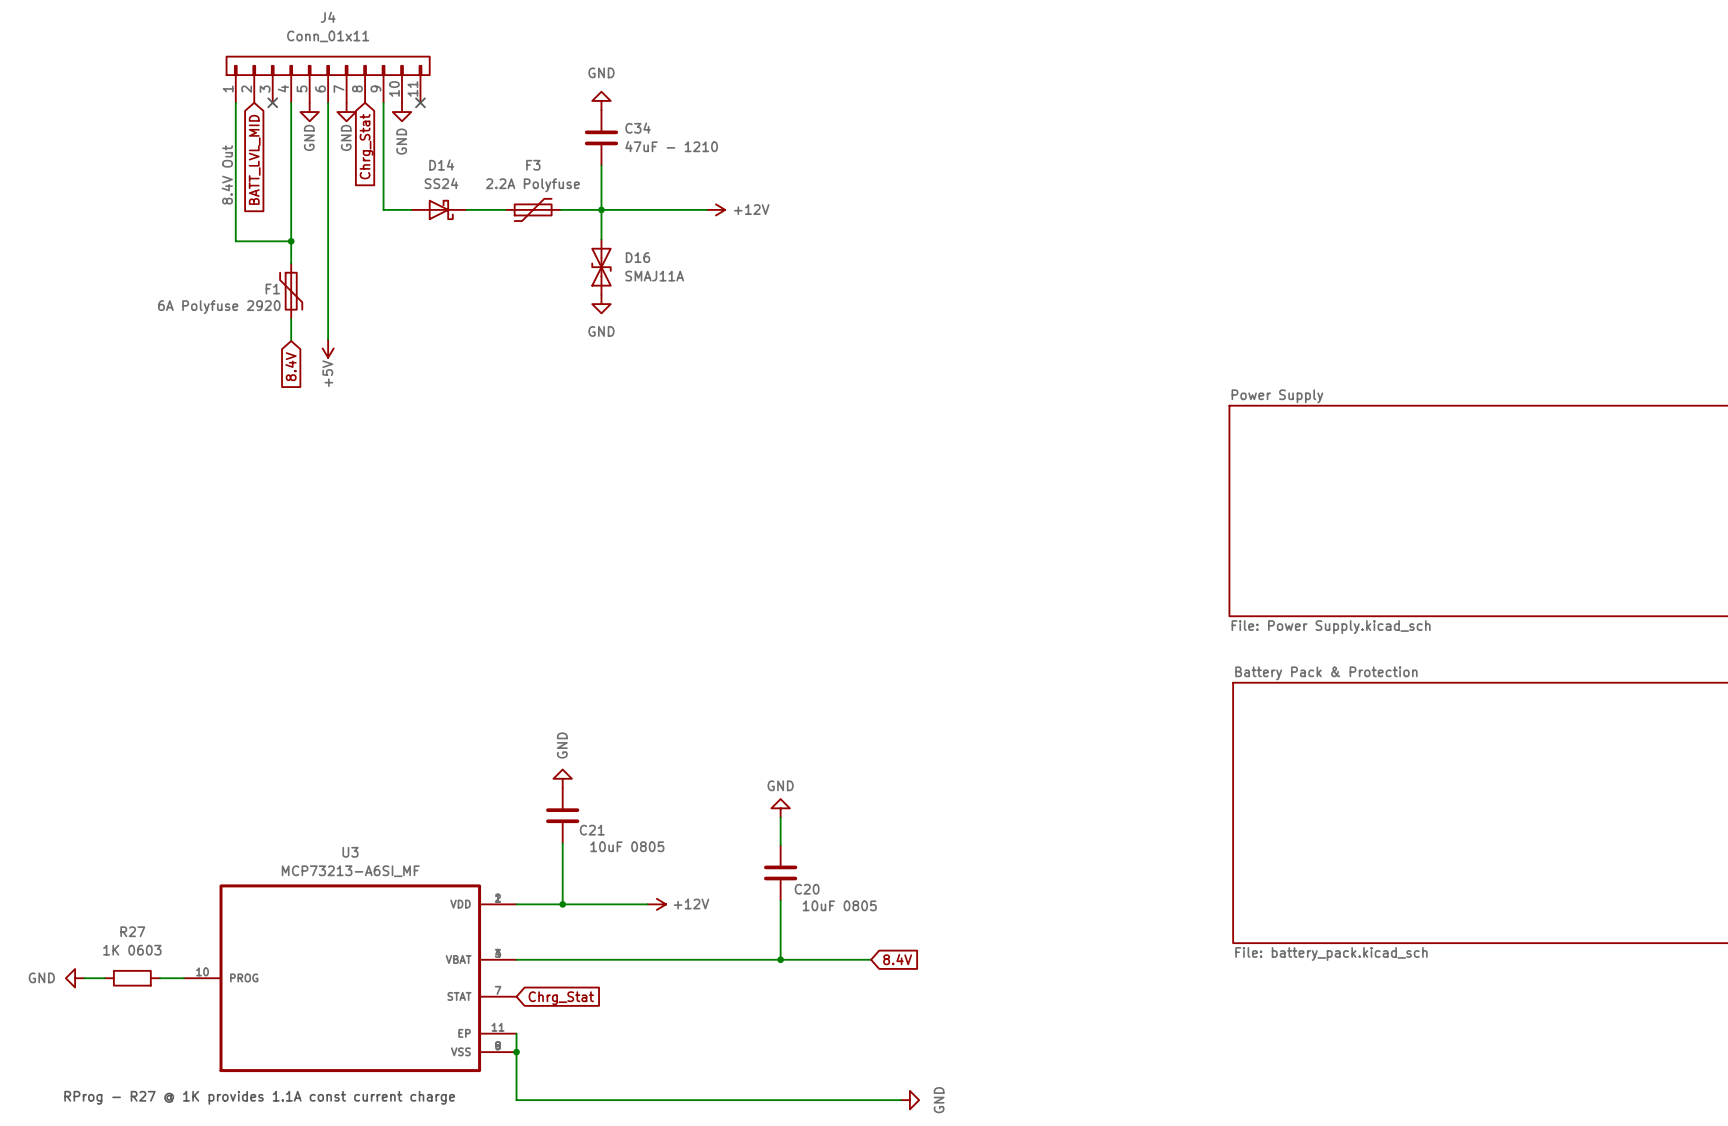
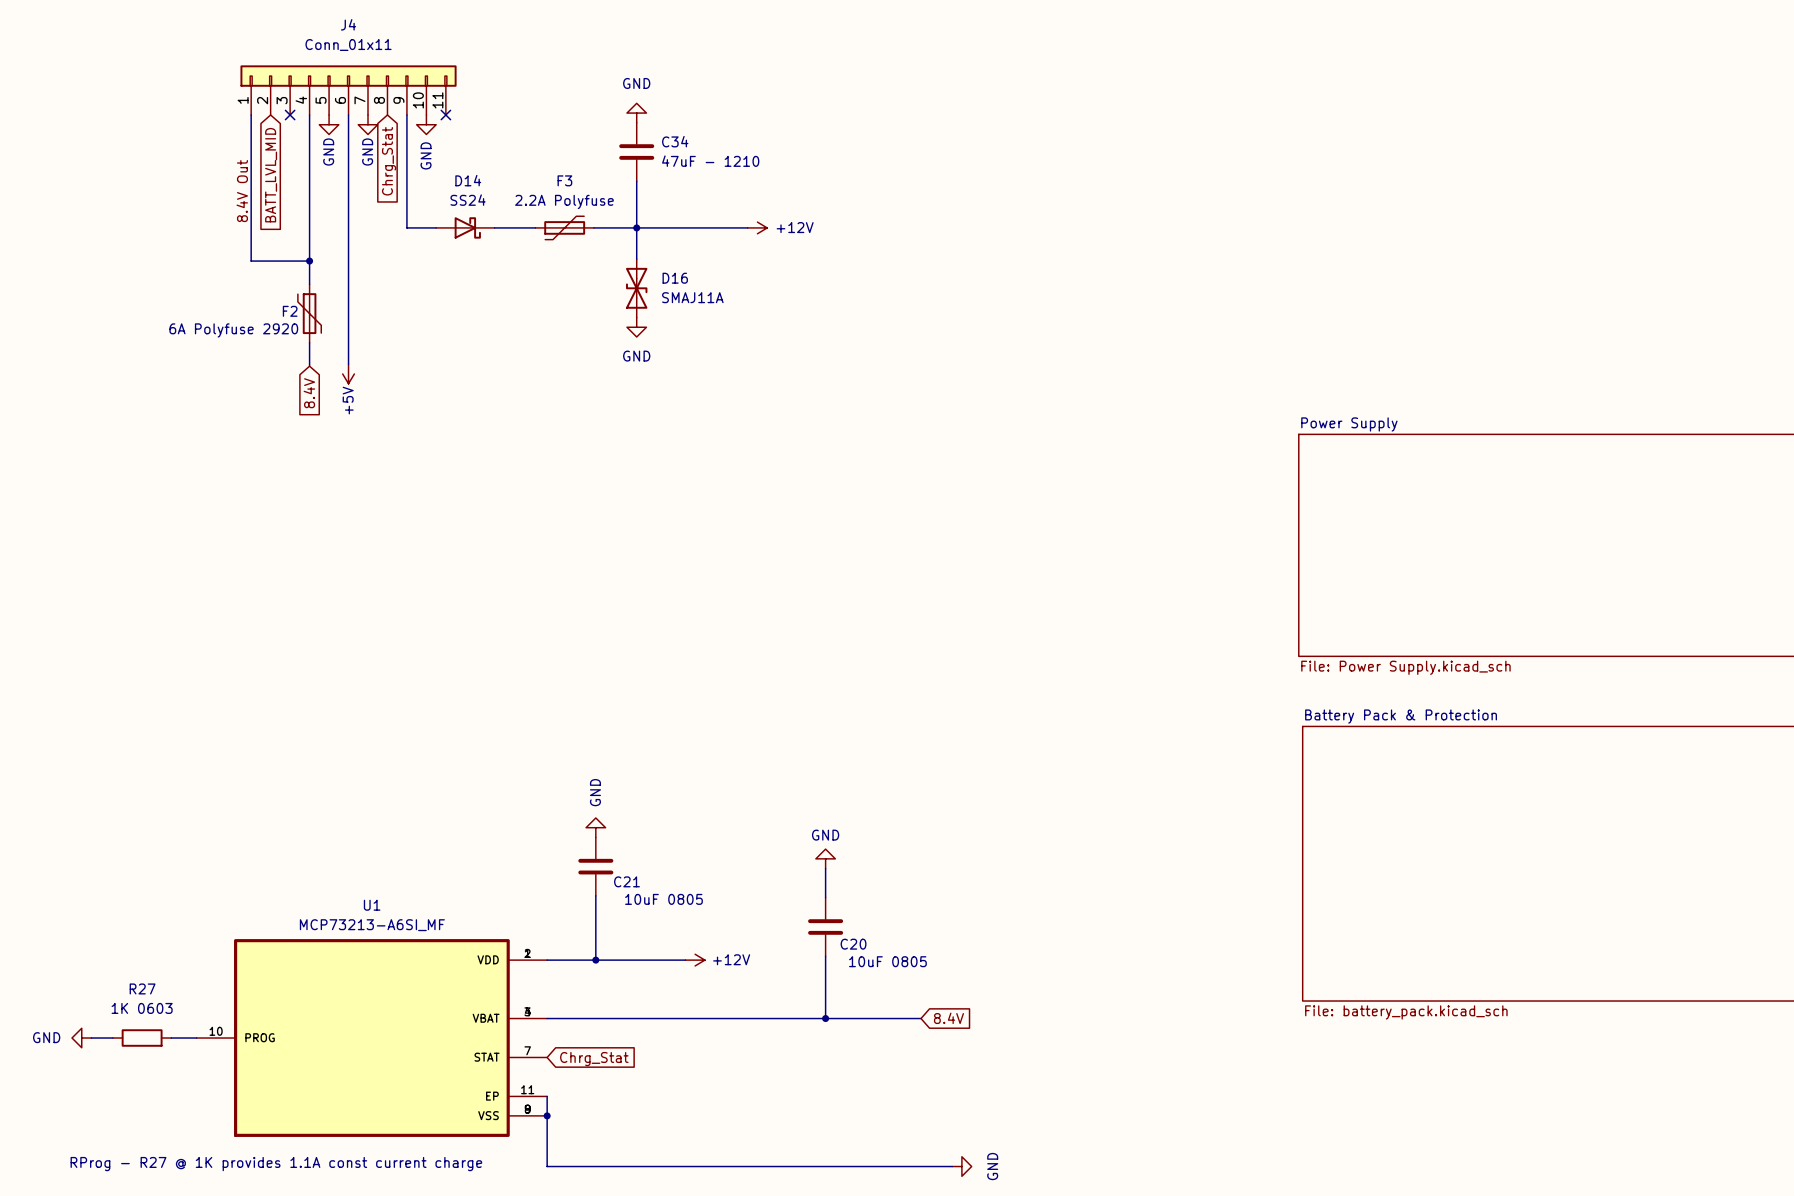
F1 name: F1 (272, 289) -> F2 (290, 311)
U3 name: U3 (350, 852) -> U1 (372, 905)

